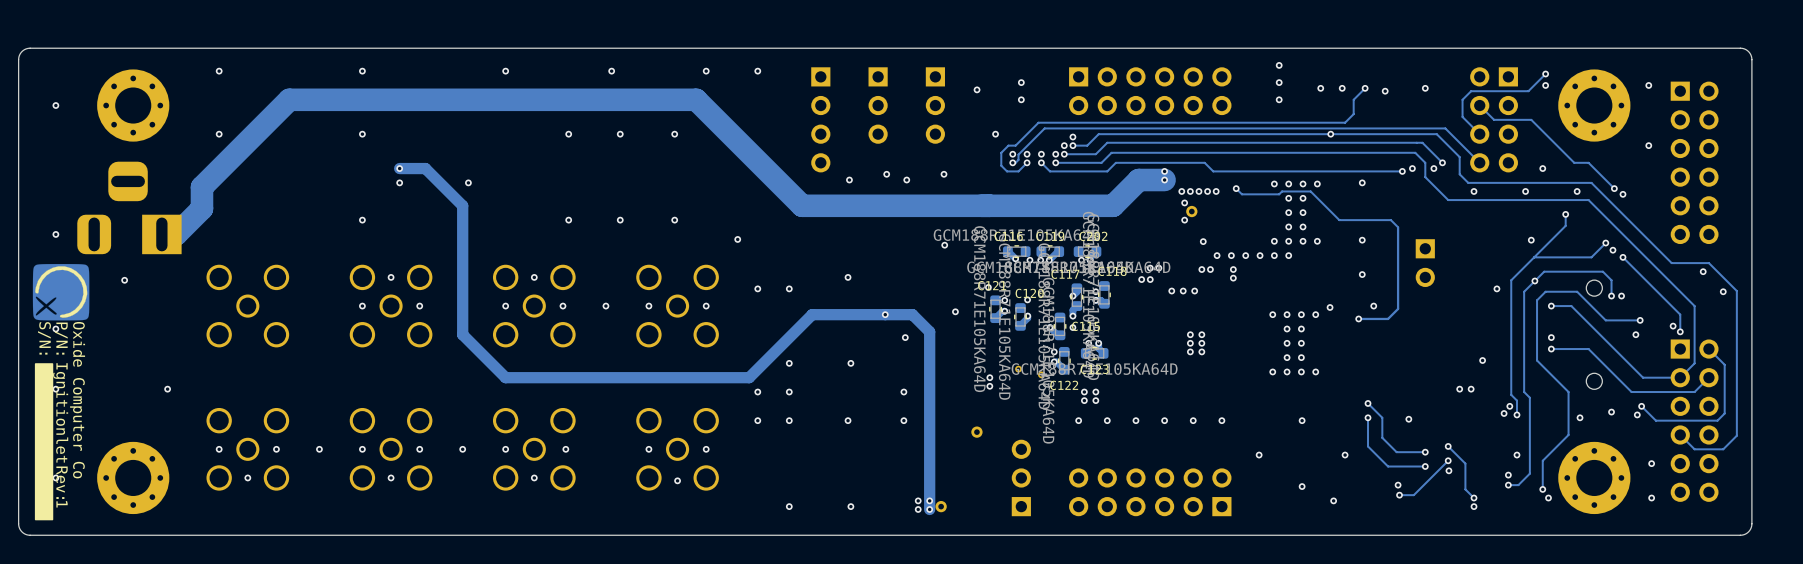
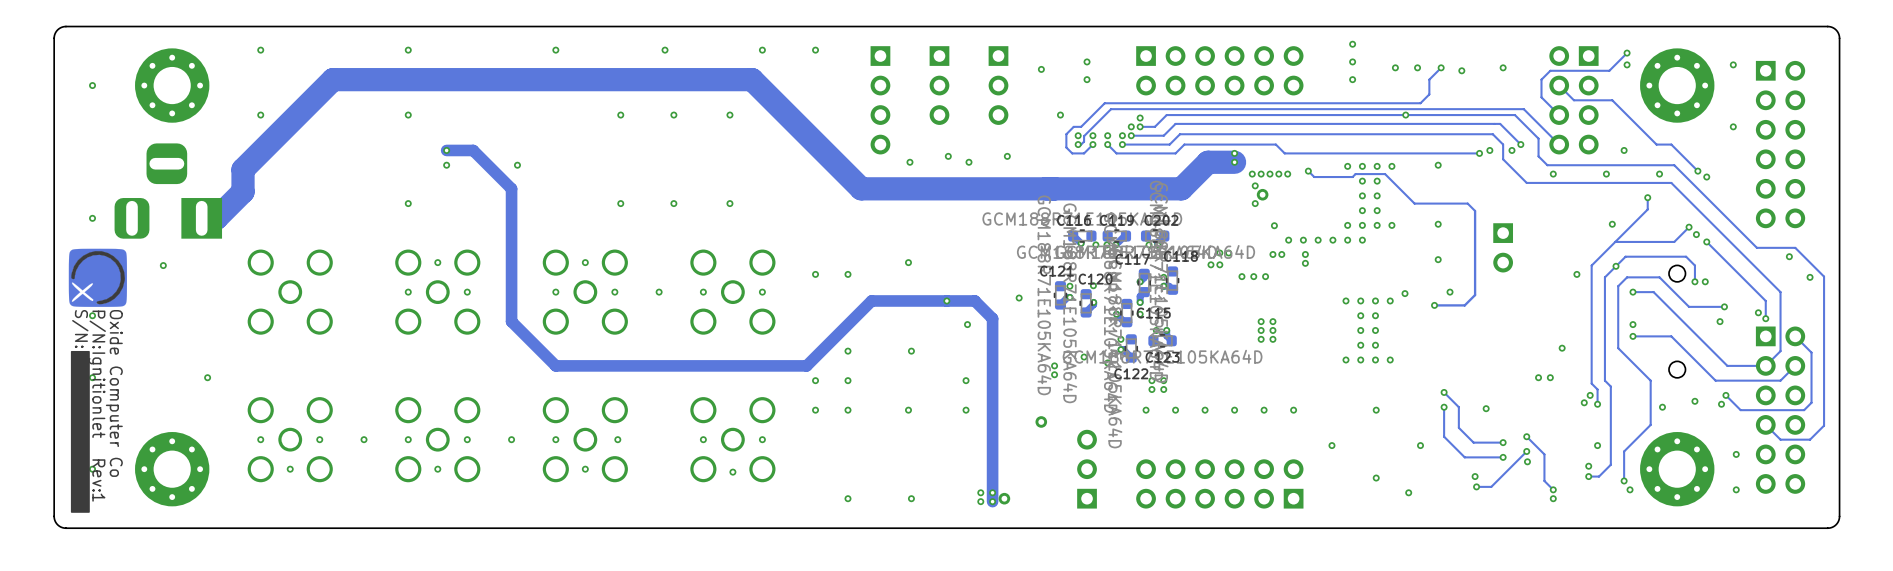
via: (737, 239) -> none
via: (944, 245) -> none
via: (988, 287) -> none

